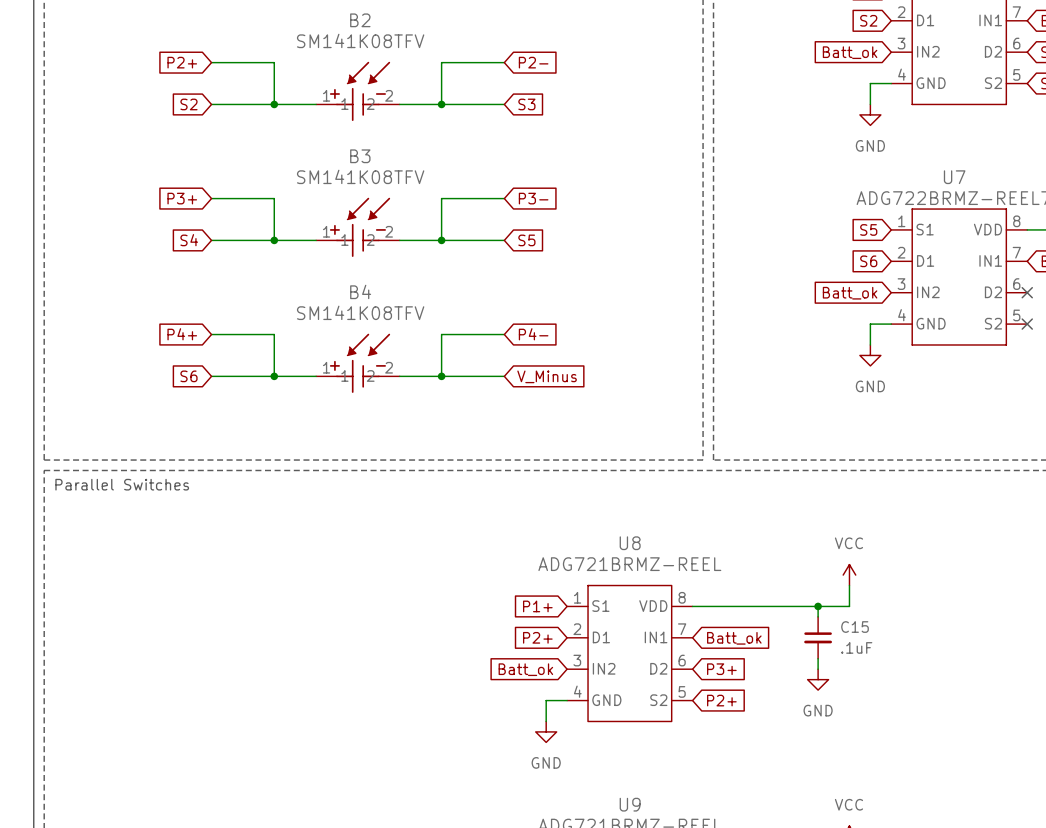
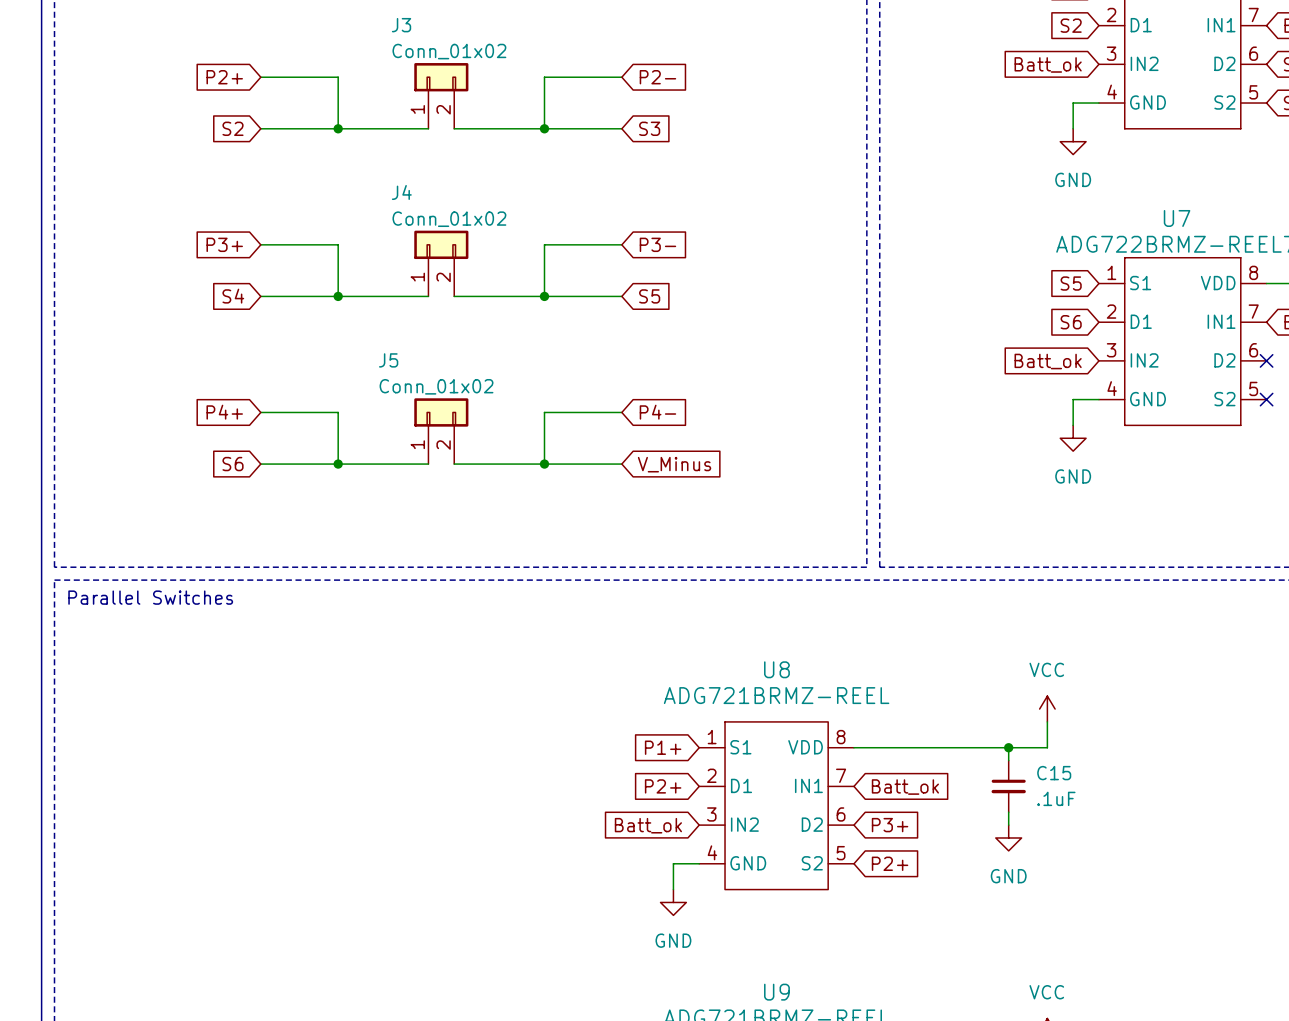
J3: none -> Conn_01x02 (441, 95)
B2: SM141K08TFV (357, 91) -> none
J4: none -> Conn_01x02 (441, 263)
B3: SM141K08TFV (357, 227) -> none
J5: none -> Conn_01x02 (441, 431)
B4: SM141K08TFV (357, 363) -> none

